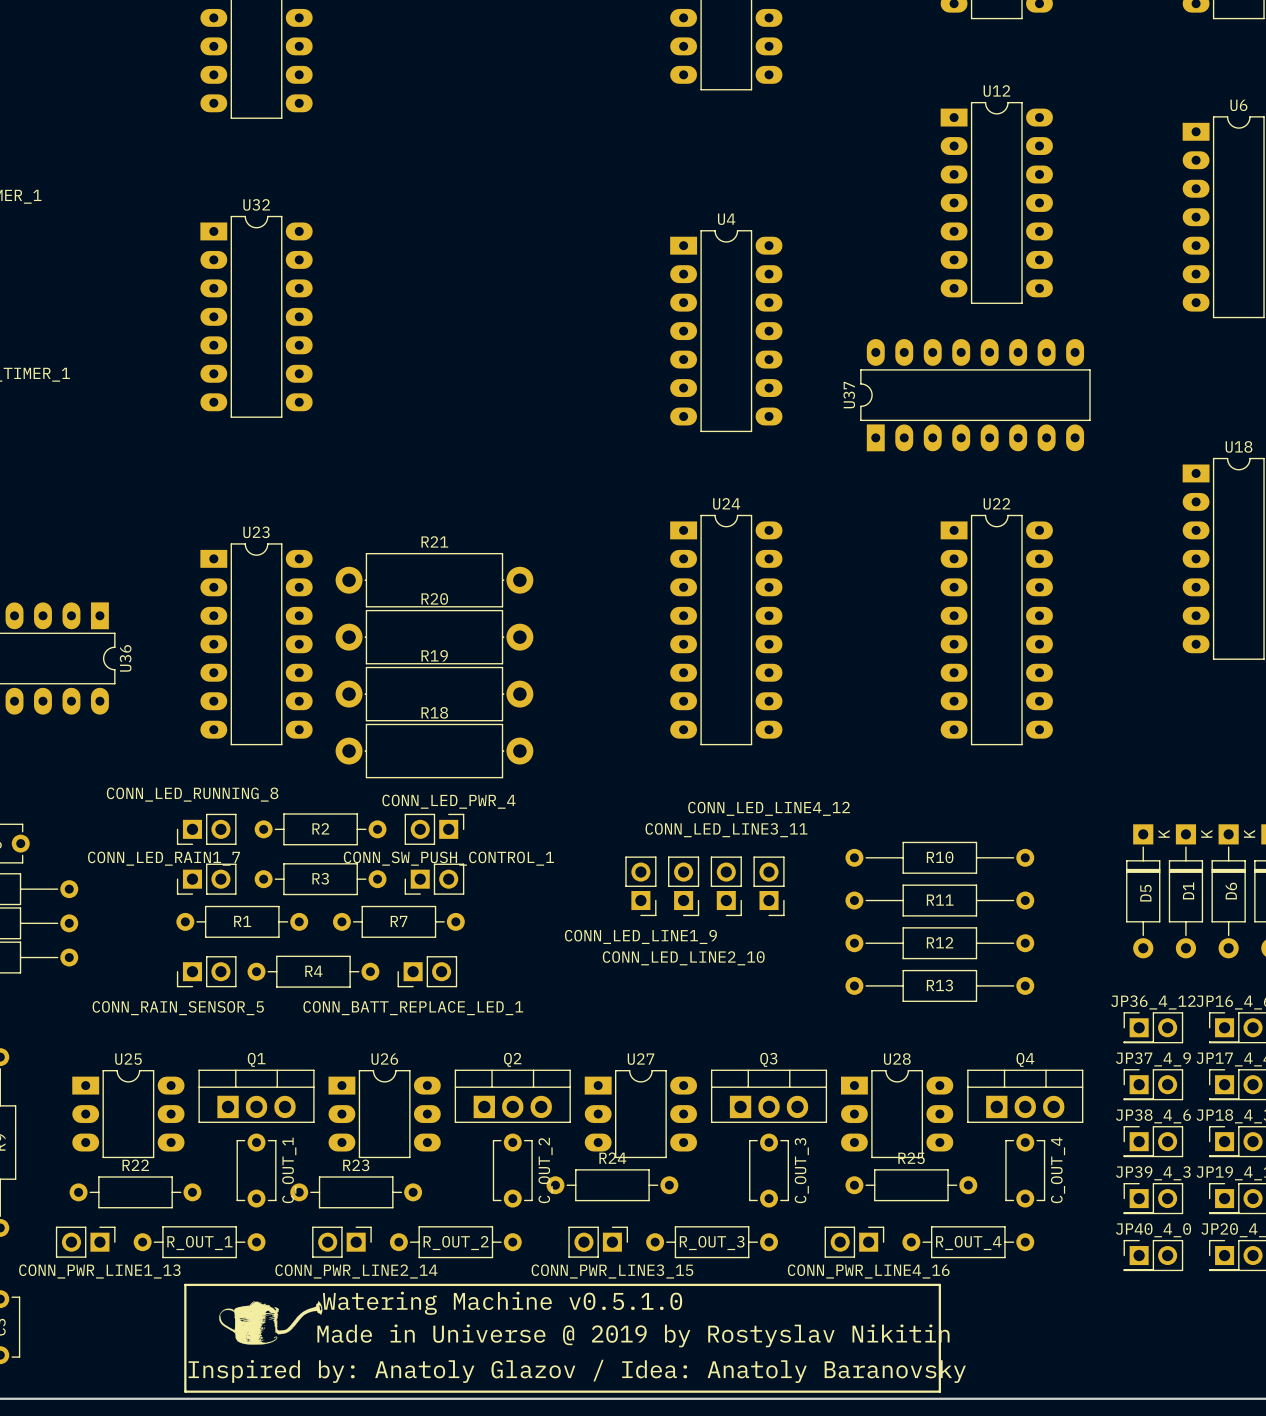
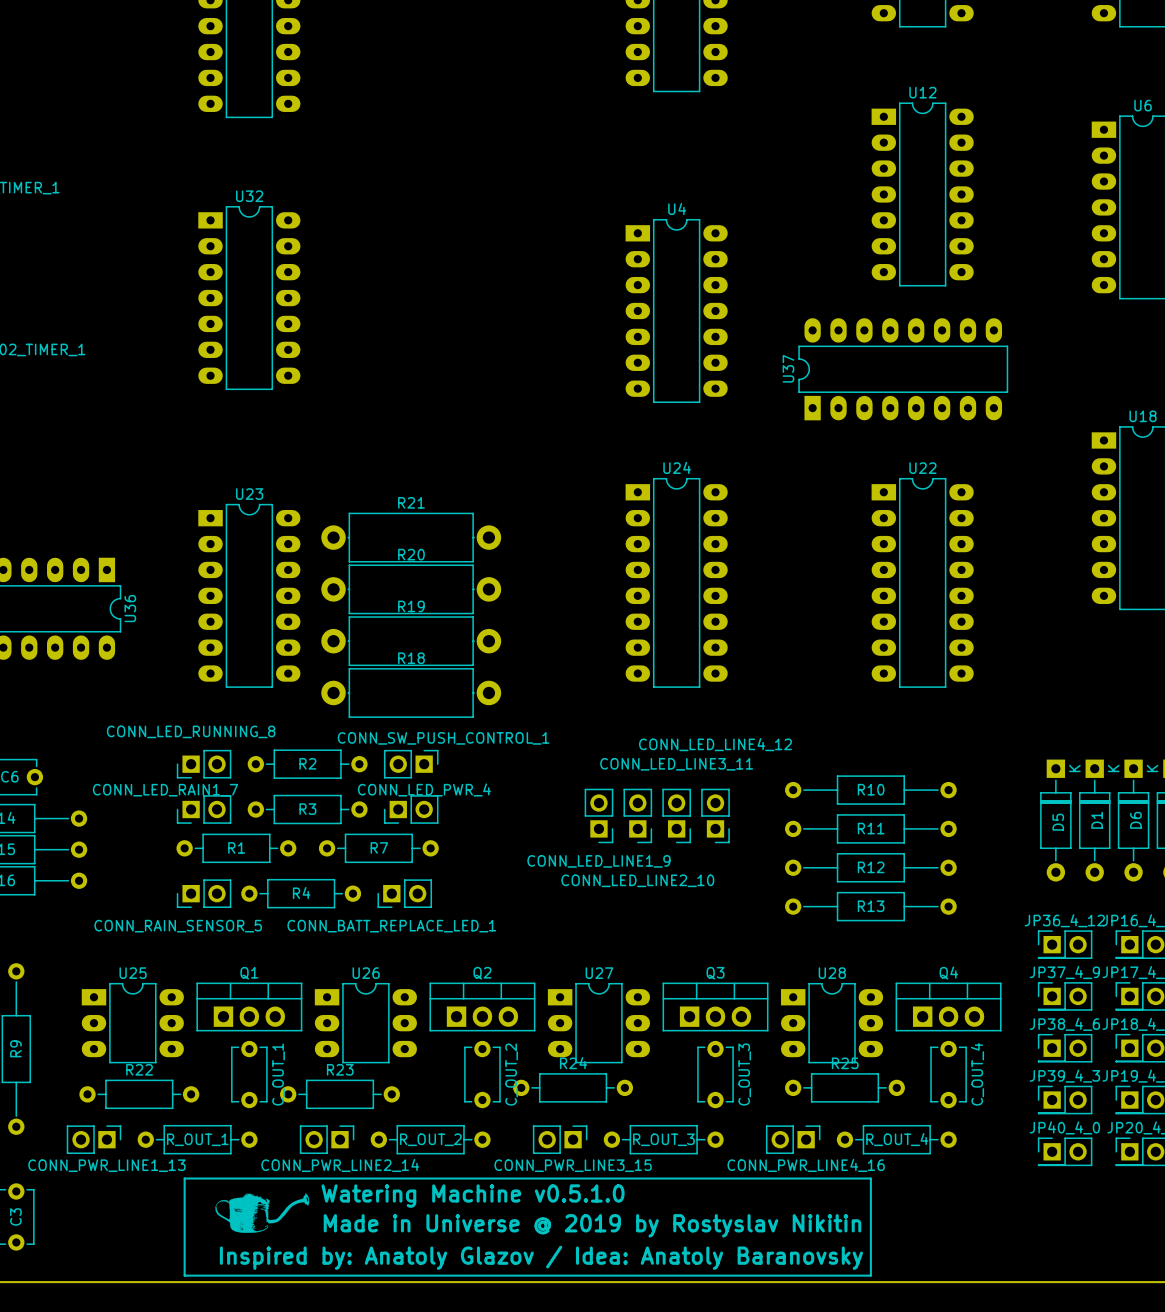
CONN_LED_PWR_4 name position: CONN_LED_PWR_4 (448, 801) -> CONN_LED_PWR_4 (424, 789)
CONN_SW_PUSH_CONTROL_1 name position: CONN_SW_PUSH_CONTROL_1 (448, 858) -> CONN_SW_PUSH_CONTROL_1 (443, 738)

